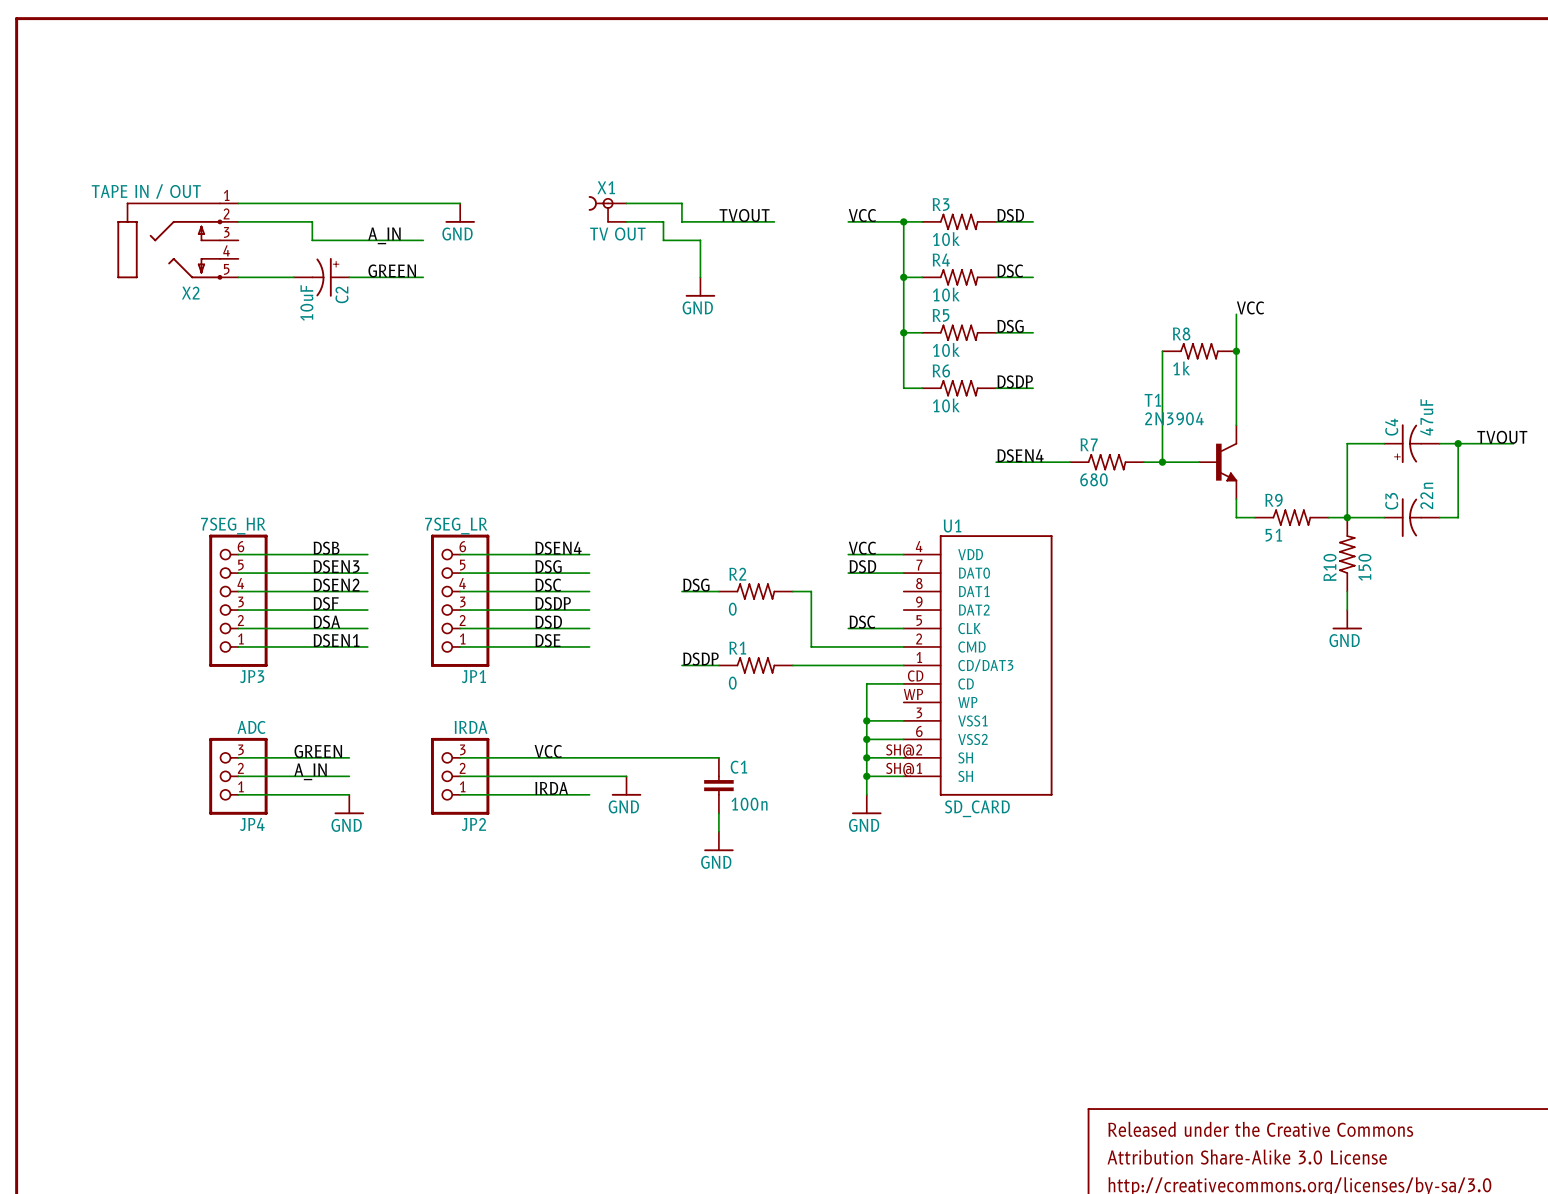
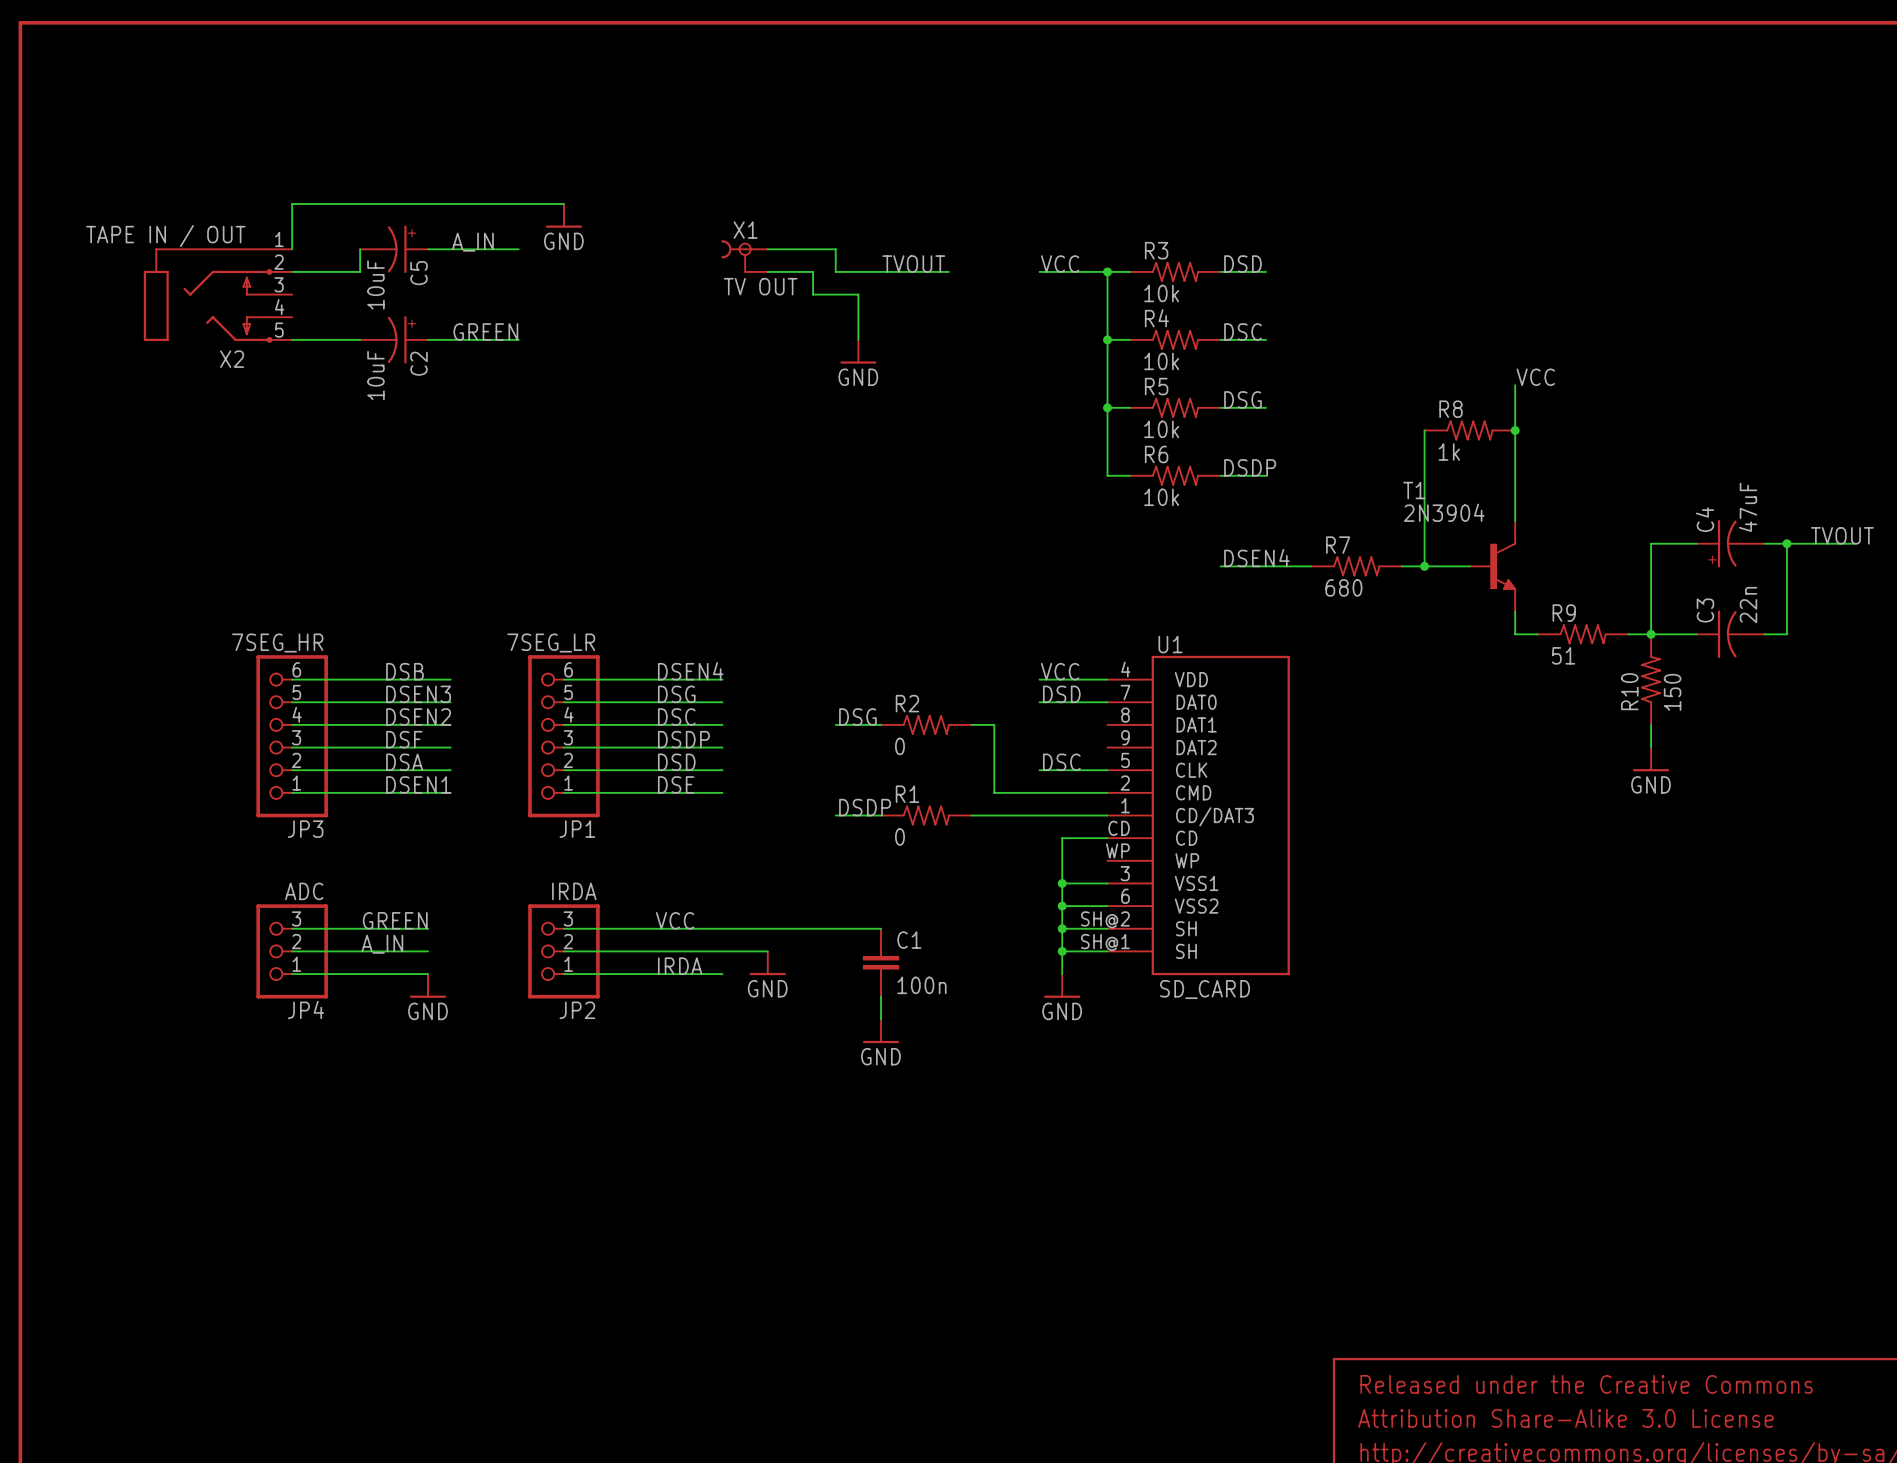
wire: (238, 203) (349, 203) -> (292, 249) (292, 204) (563, 204)
C5: none -> 10uF (394, 249)
wire: (423, 203) (460, 203) -> none
power symbol position: GND (460, 213) -> GND (563, 215)
wire: (293, 221) (312, 221) (312, 240) (423, 240) -> (360, 271) (360, 249)
label position: A_IN (384, 235) -> A_IN (472, 242)

